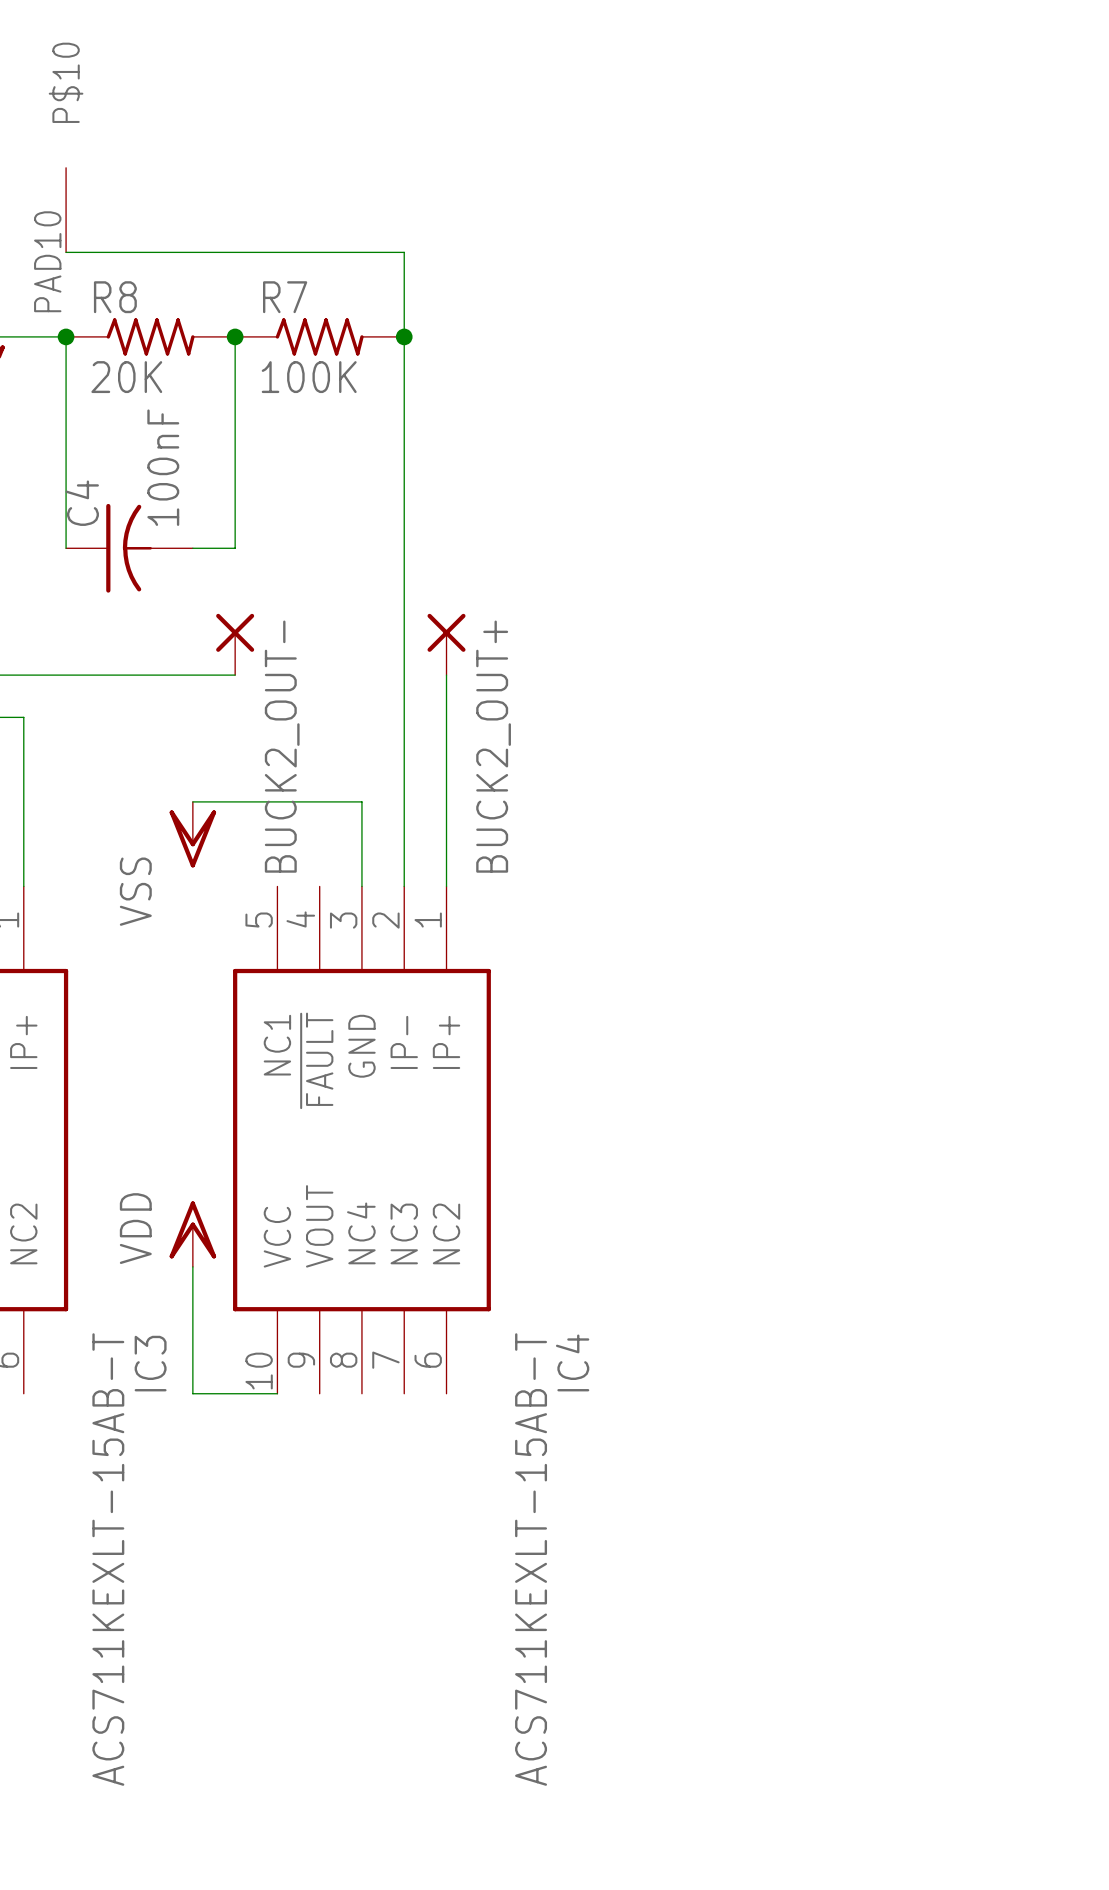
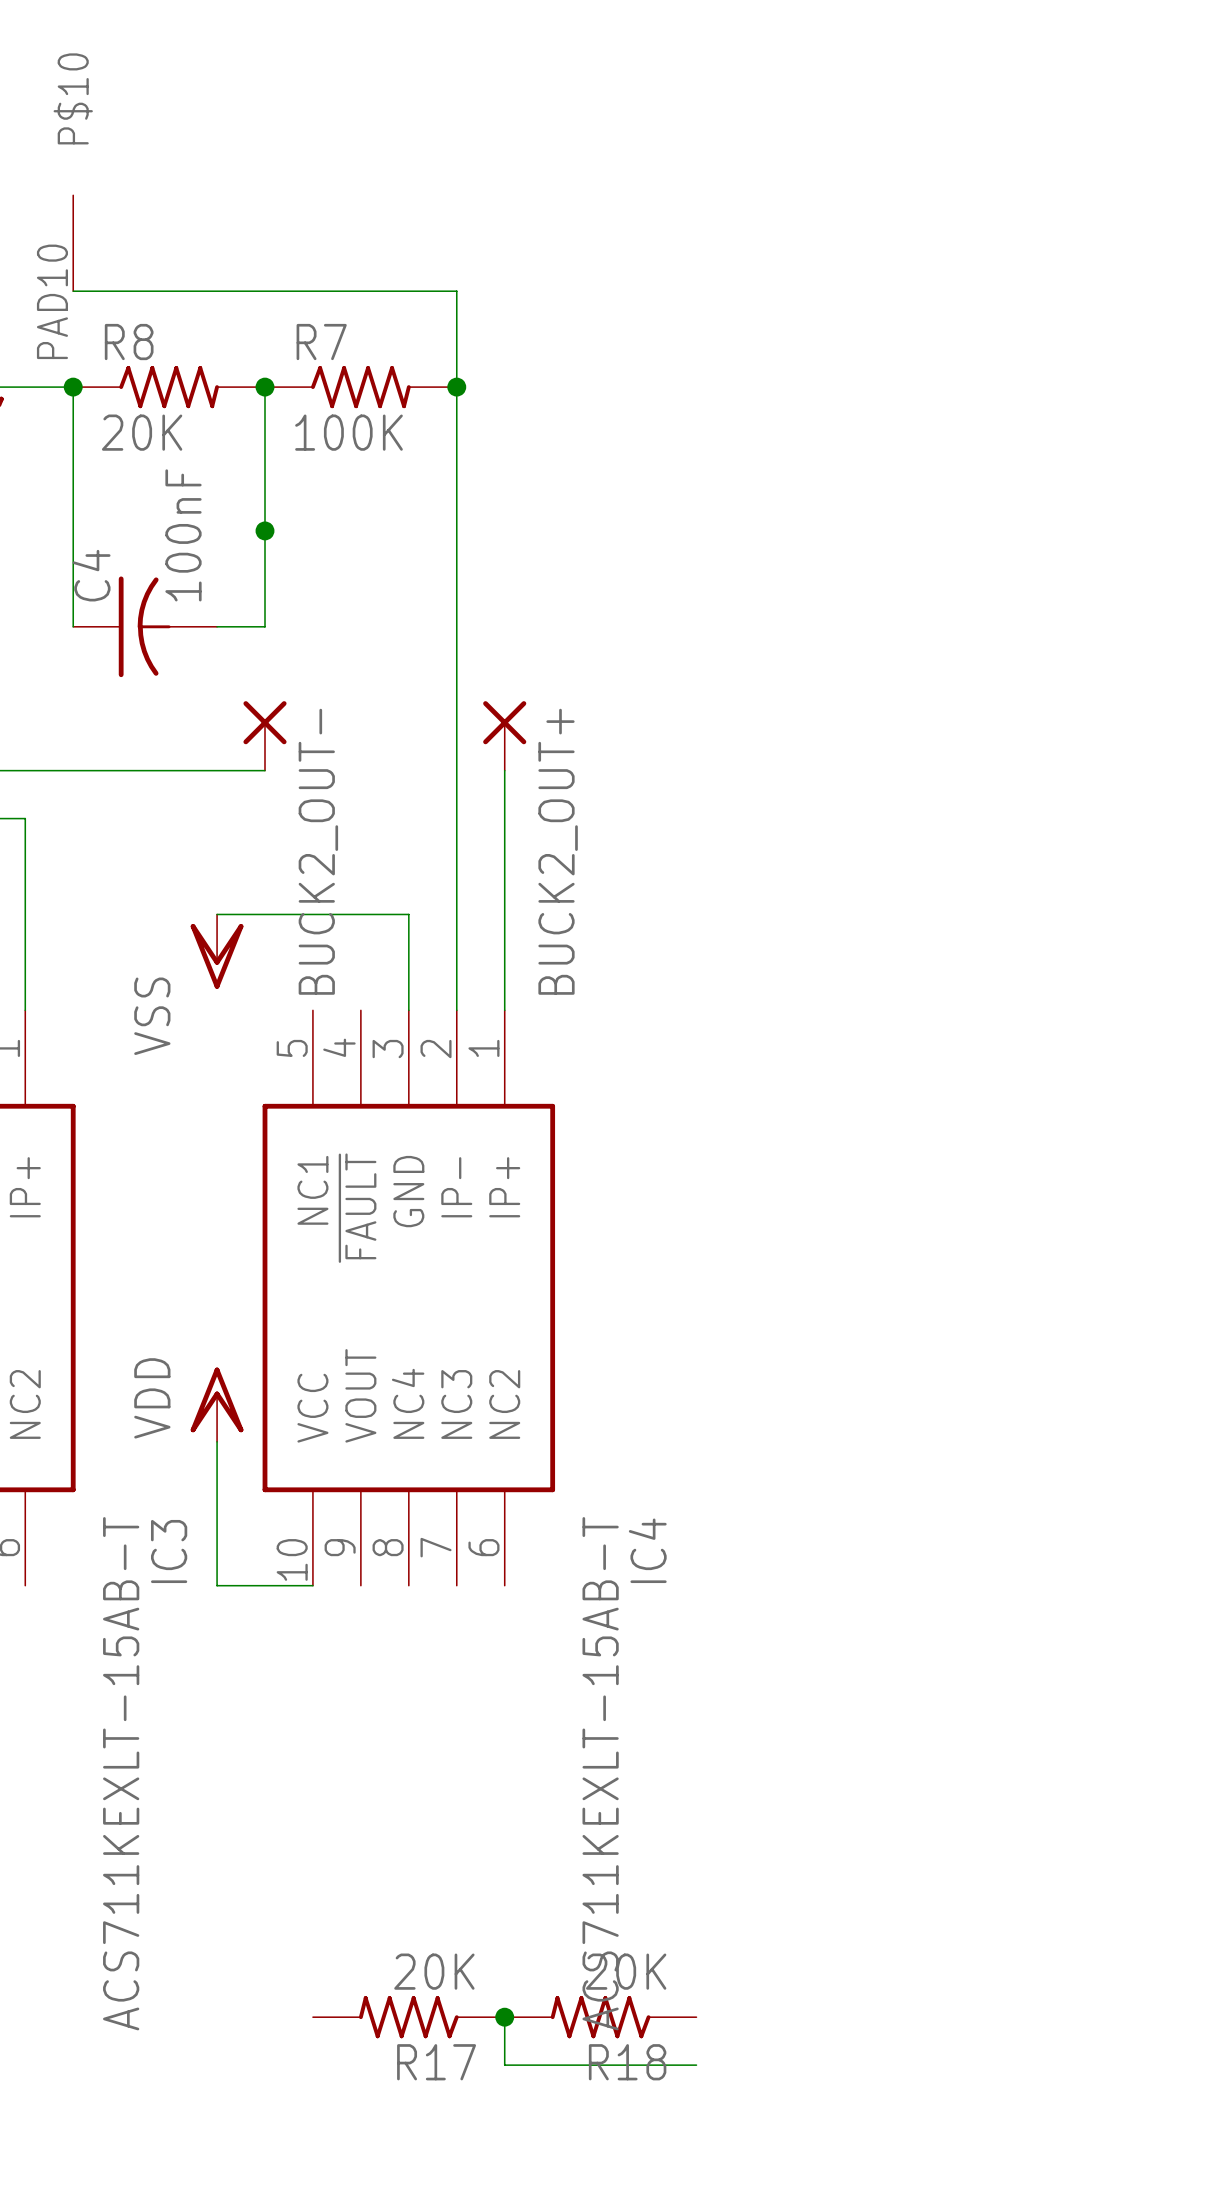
junction: none -> (265, 530)
R17: none -> 20K (408, 2017)
wire: none -> (504, 2017) (504, 2065) (696, 2065)
junction: none -> (504, 2017)
R18: none -> 20K (600, 2017)

